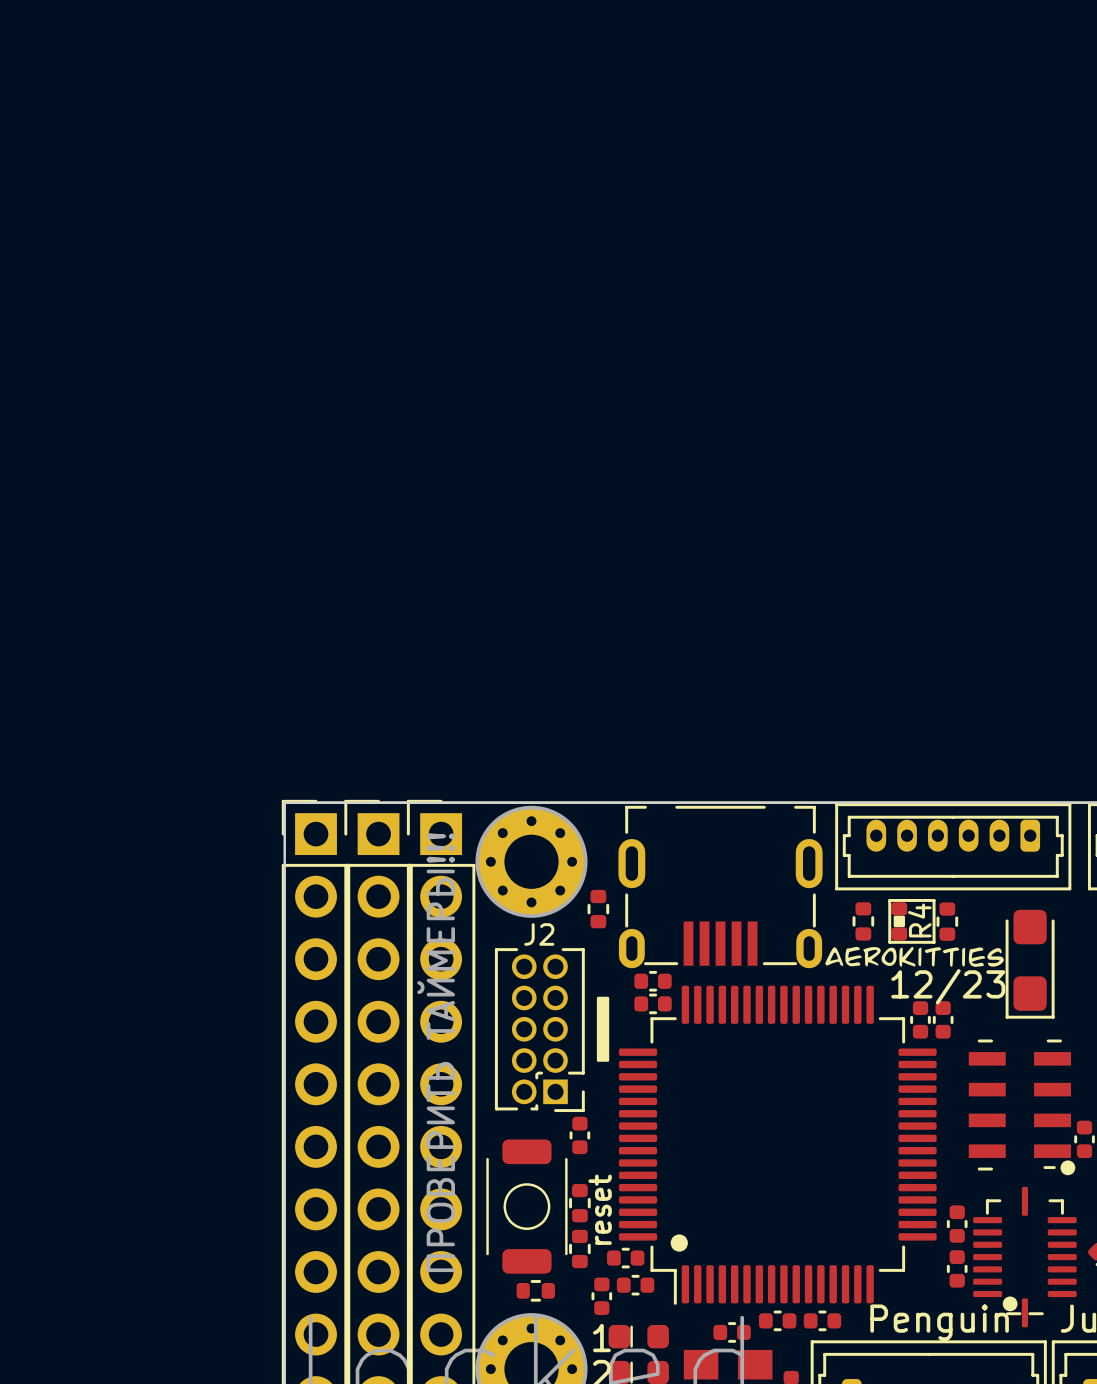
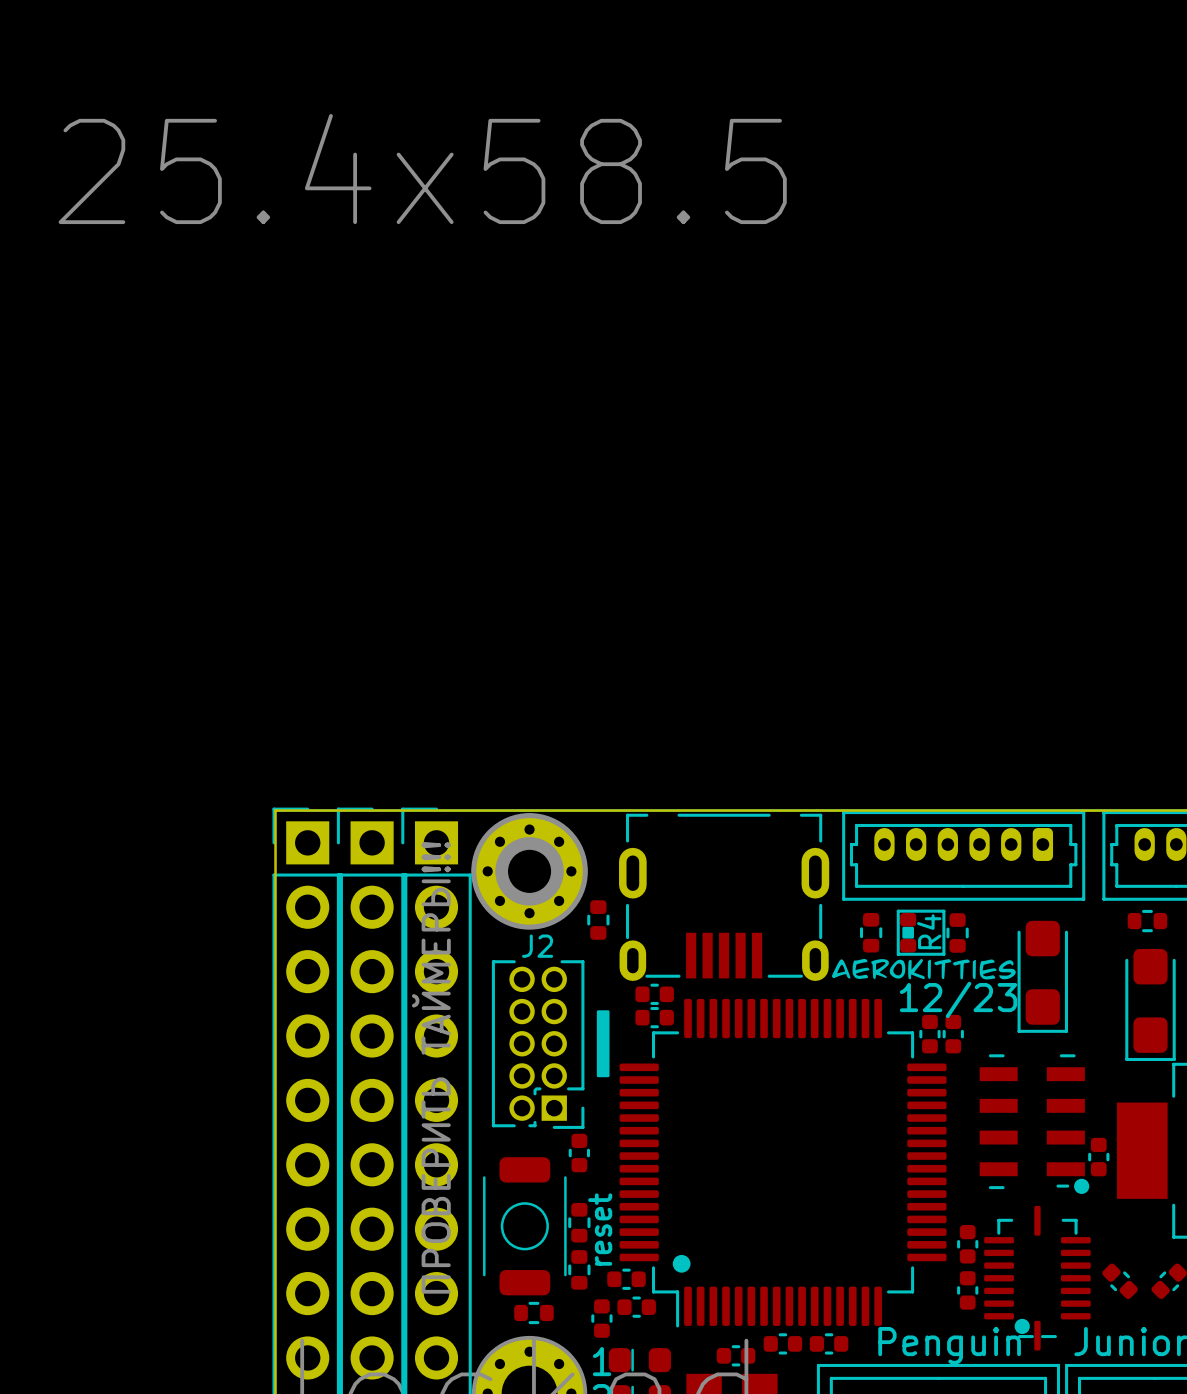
text: none -> 25.4x58.5 (422, 169)
drawing: none -> [471, 813, 588, 930]

